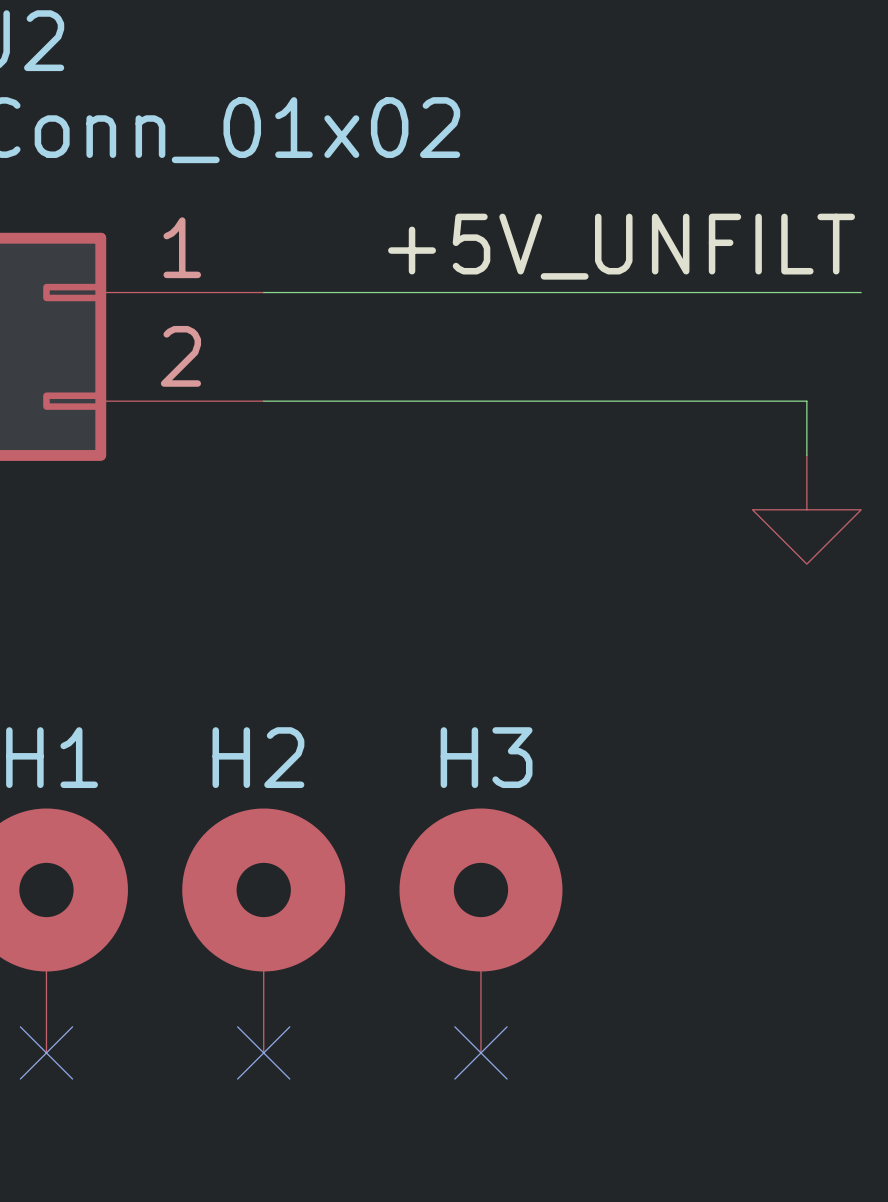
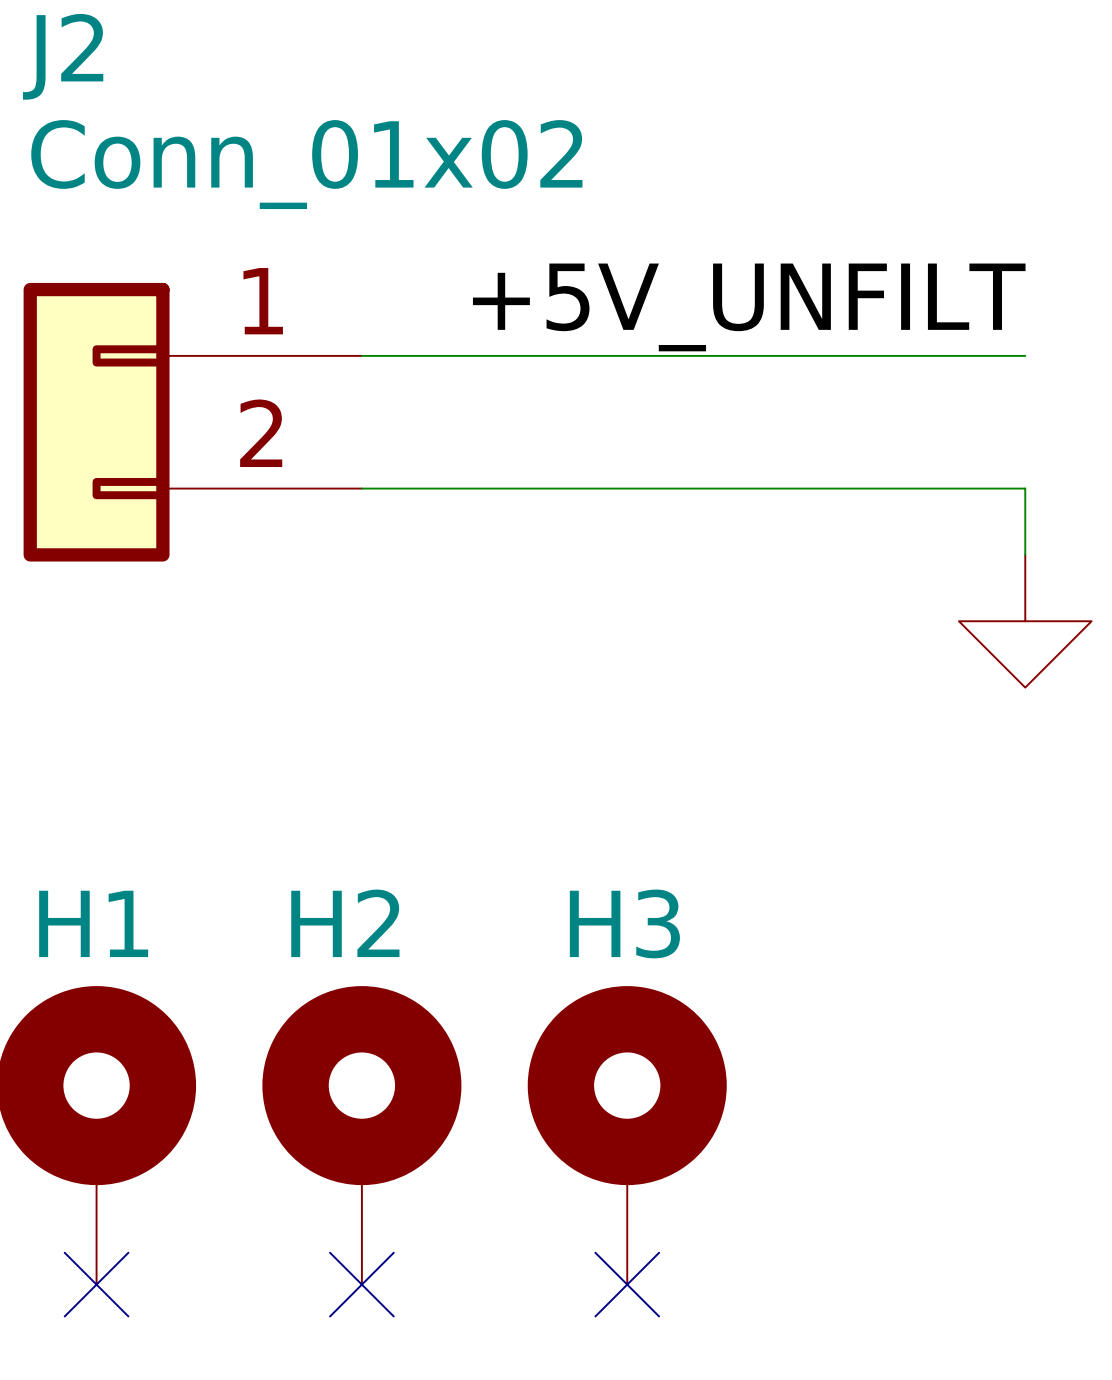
label position: +5V_UNFILT (621, 246) -> +5V_UNFILT (749, 307)
wire: (806, 292) (861, 292) -> none

